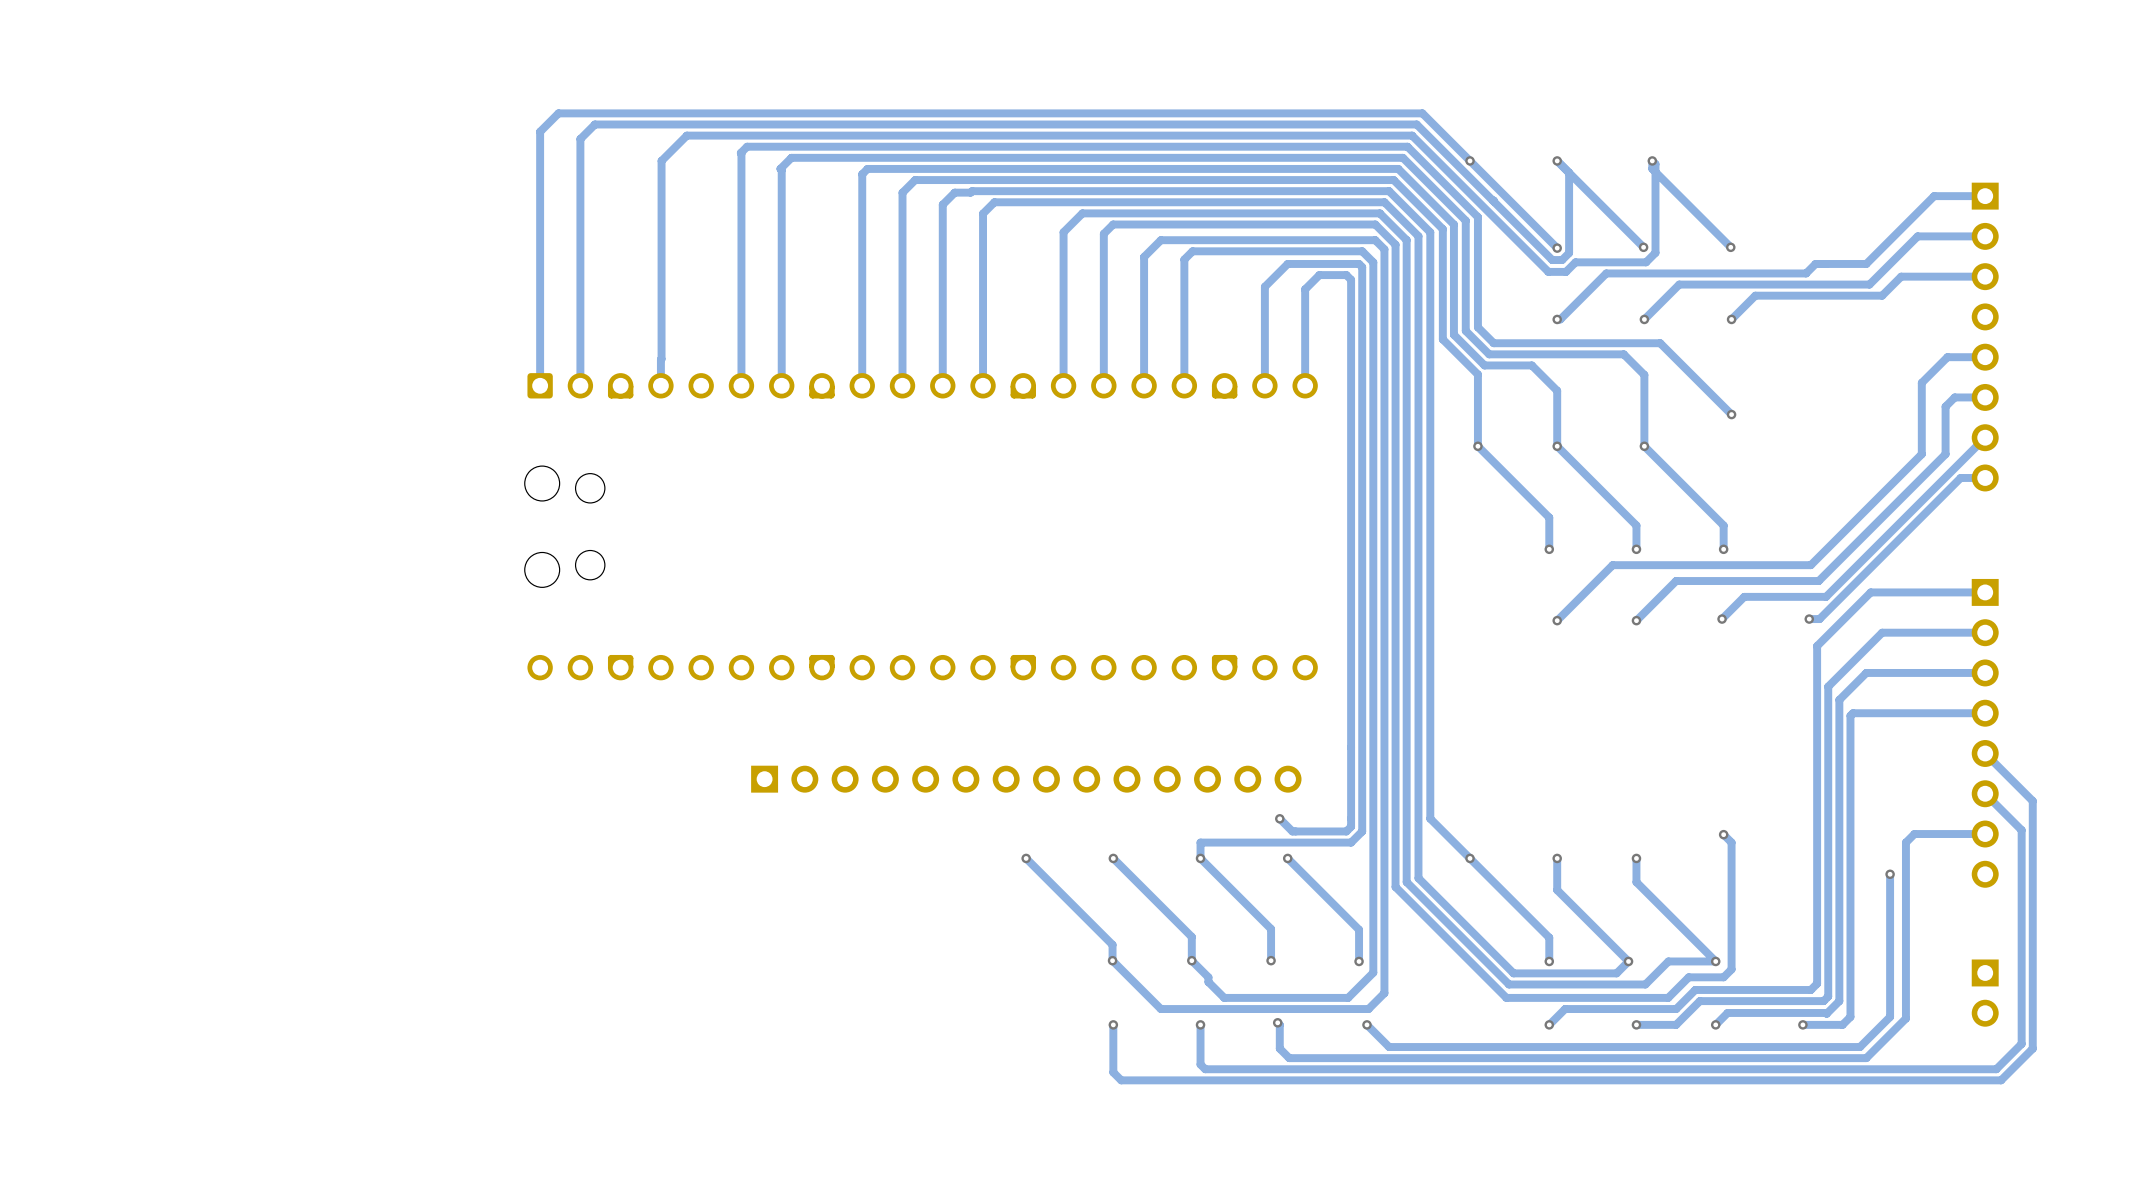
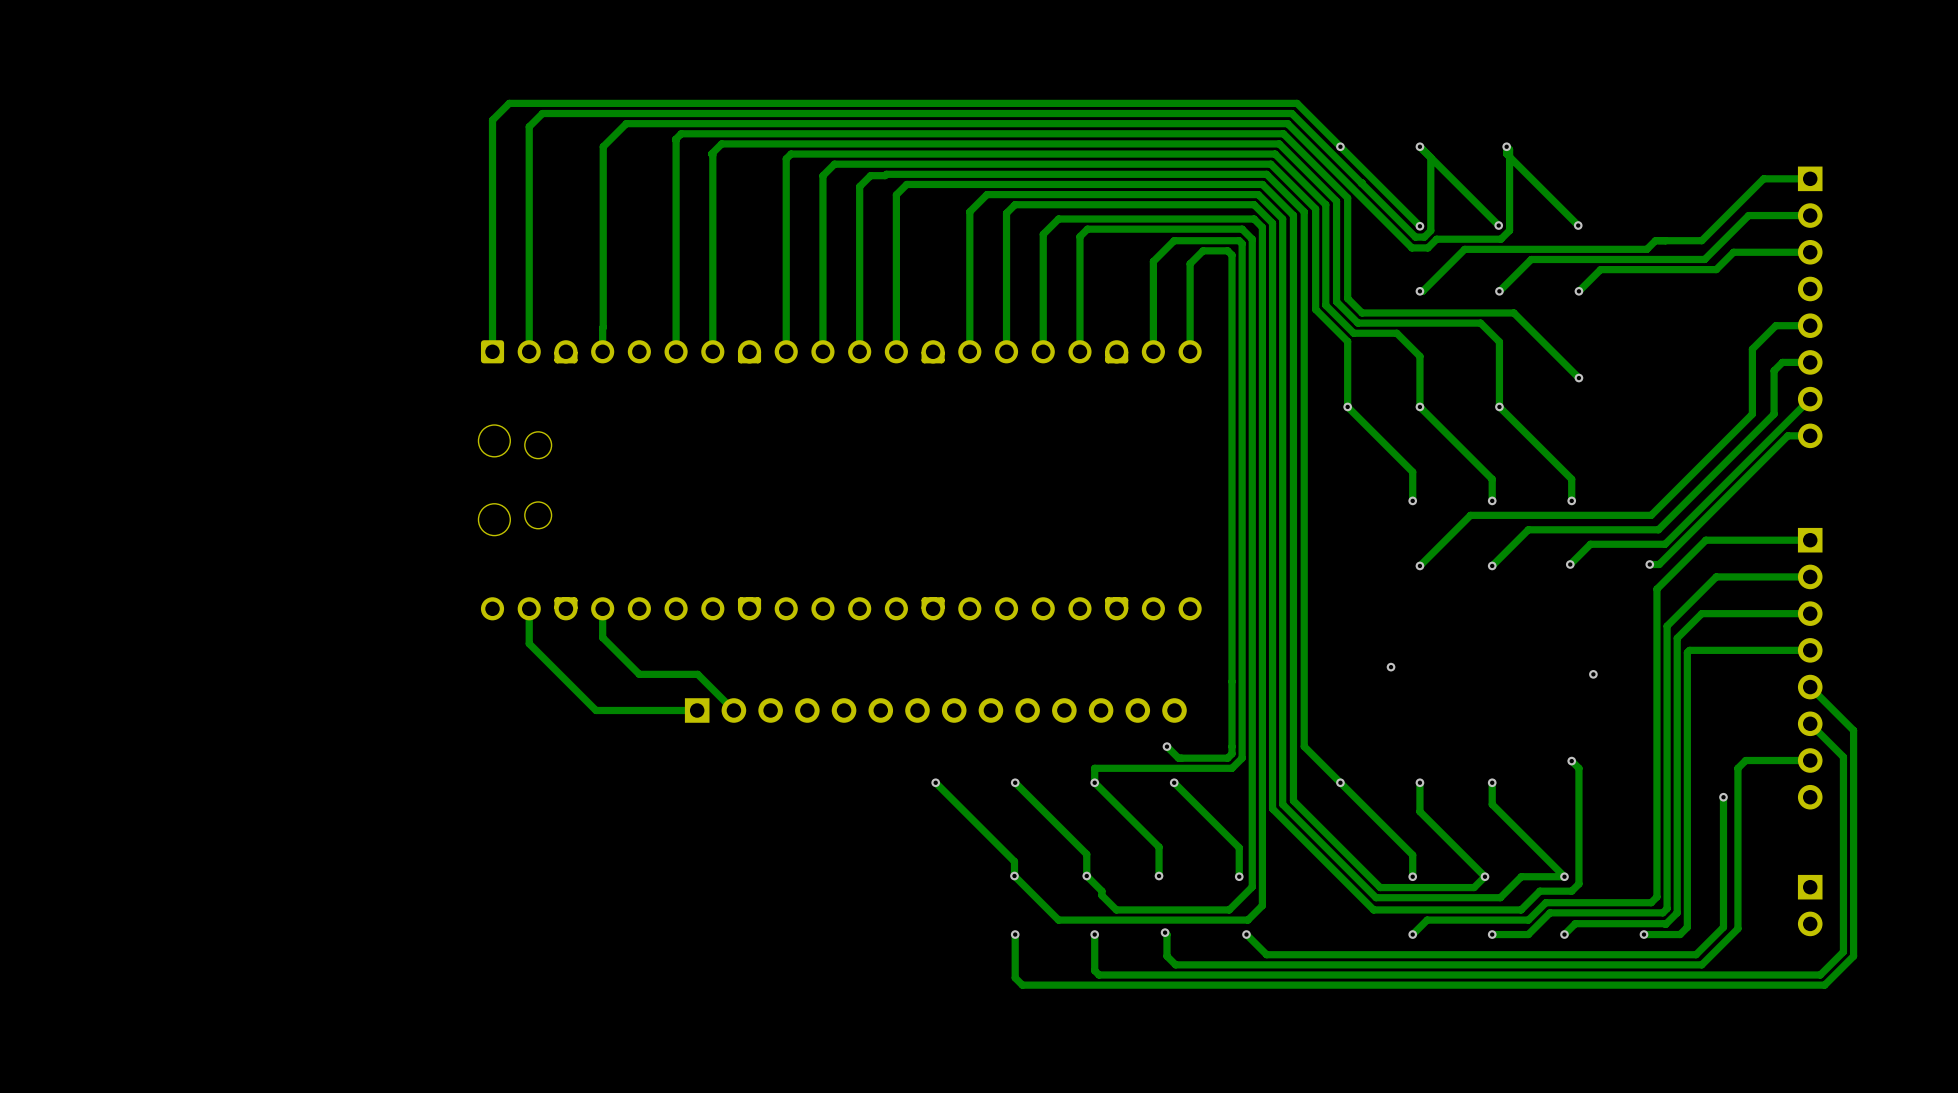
track: none -> (529, 608) (529, 643) (596, 710) (697, 710)
track: none -> (602, 608) (602, 637) (639, 674) (697, 674) (733, 710)
via: none -> (1391, 667)
via: none -> (1593, 674)

